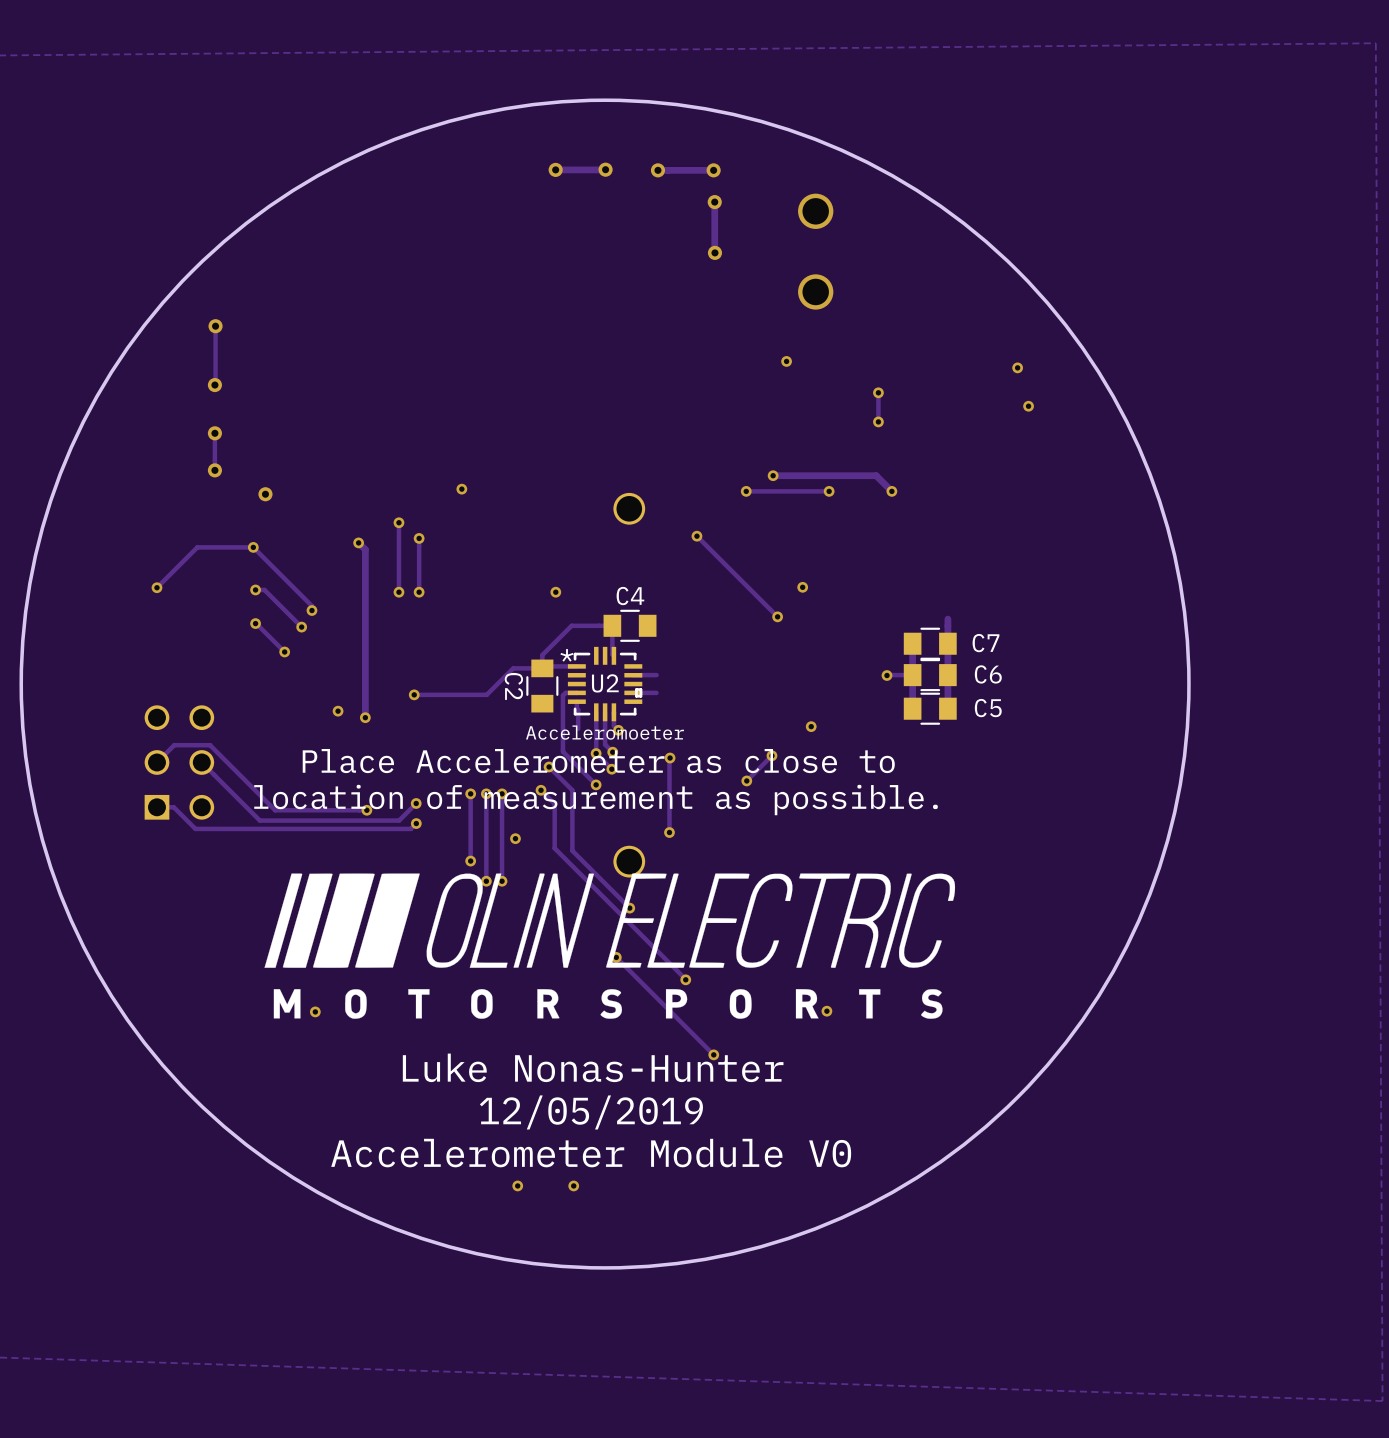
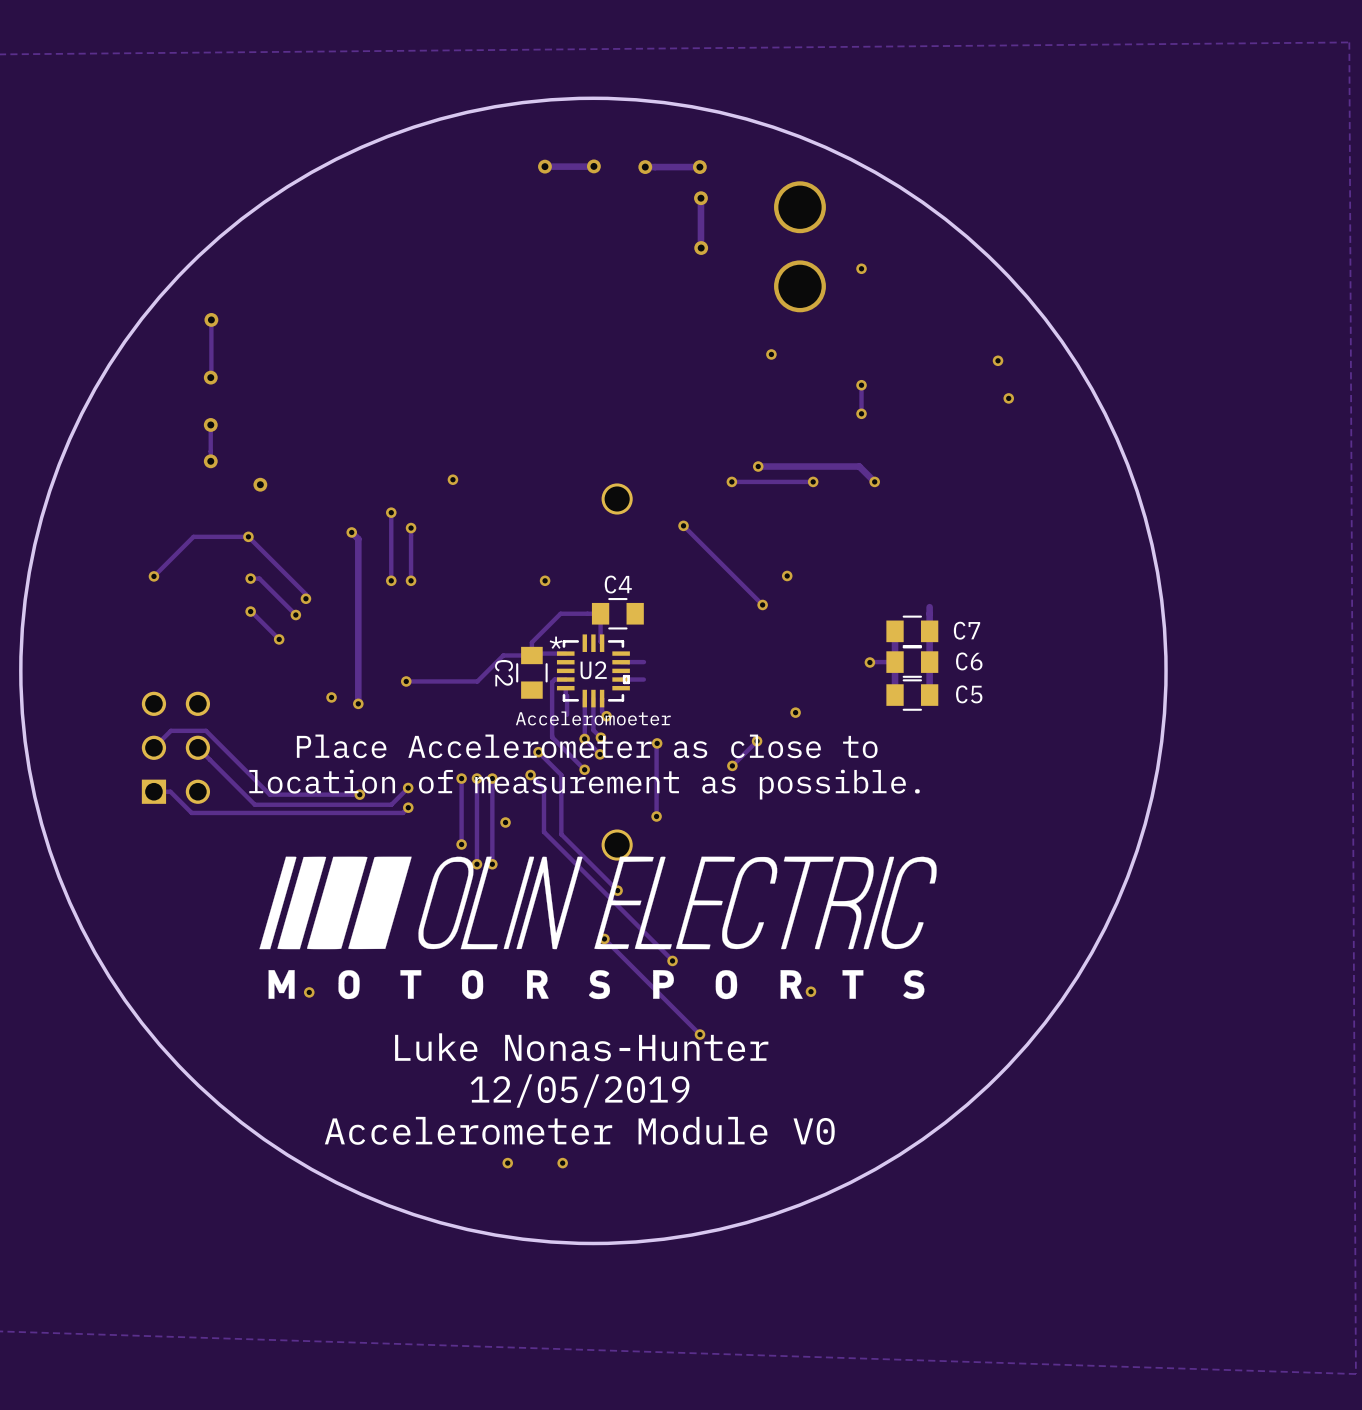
via size: [798, 193, 834, 229] -> [774, 181, 826, 234]
via size: [798, 274, 834, 310] -> [774, 260, 826, 313]
via: none -> (861, 268)

